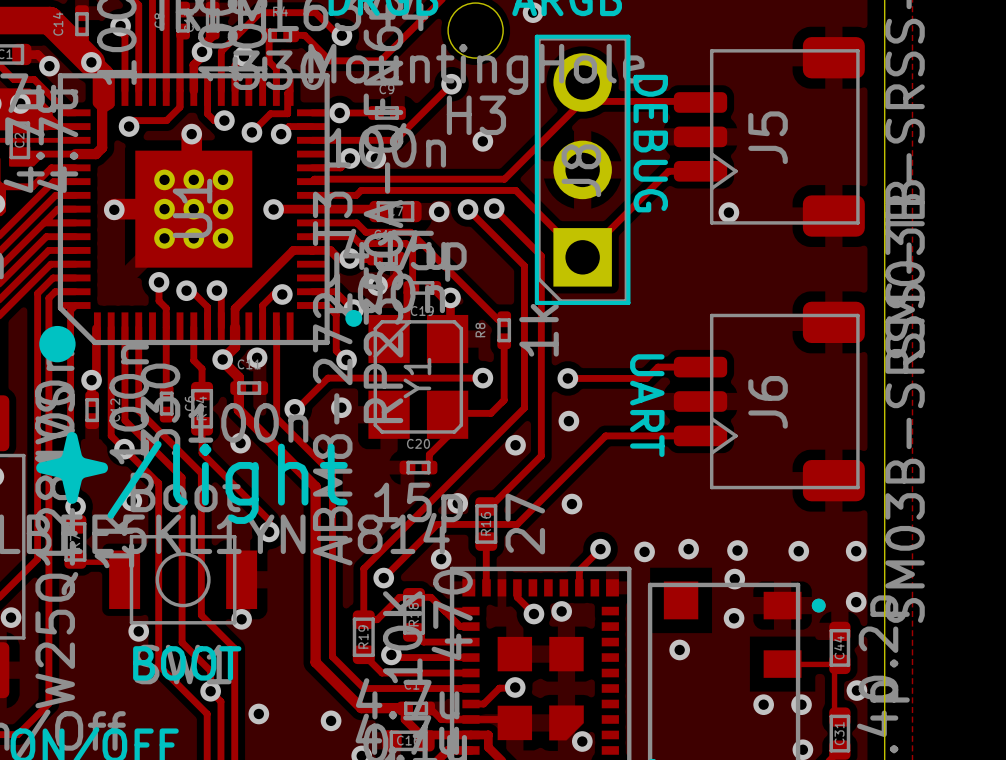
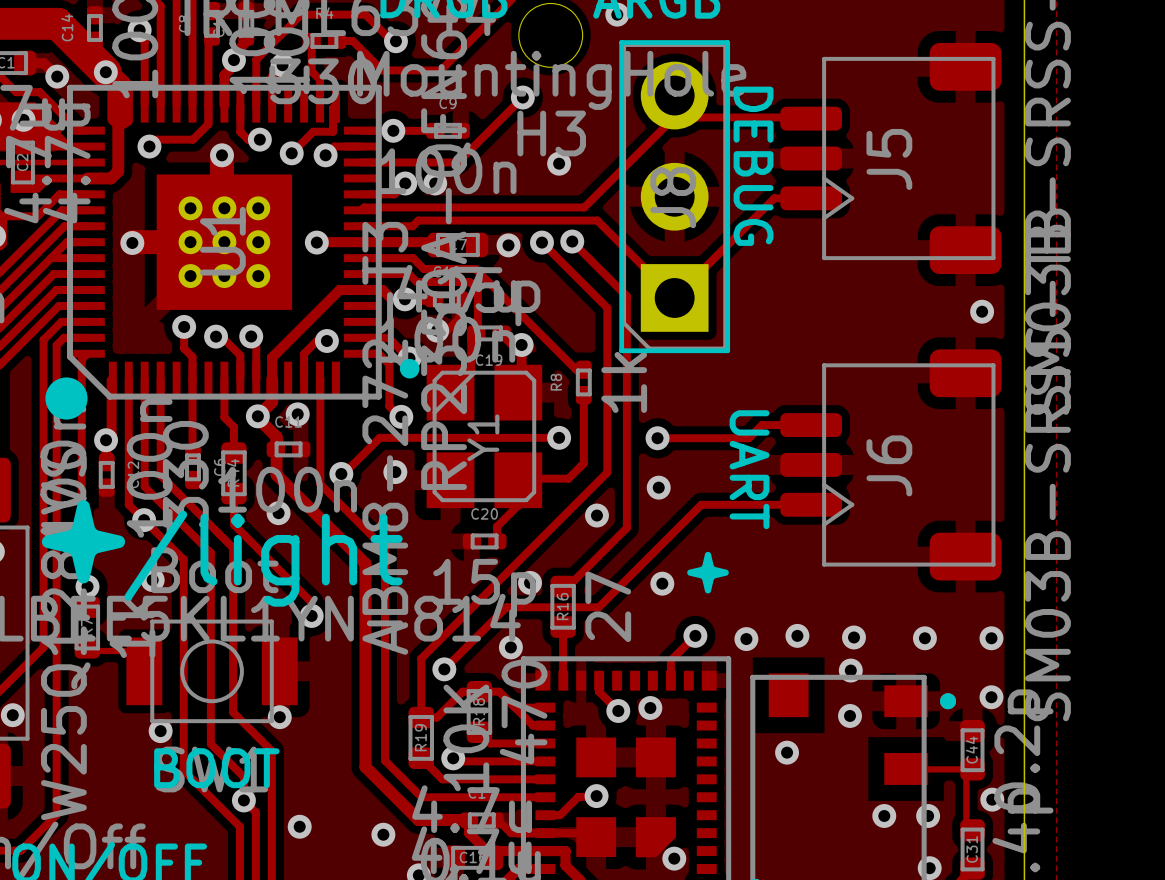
via position: (728, 212) -> (982, 311)
drawing: none -> [687, 551, 729, 594]

